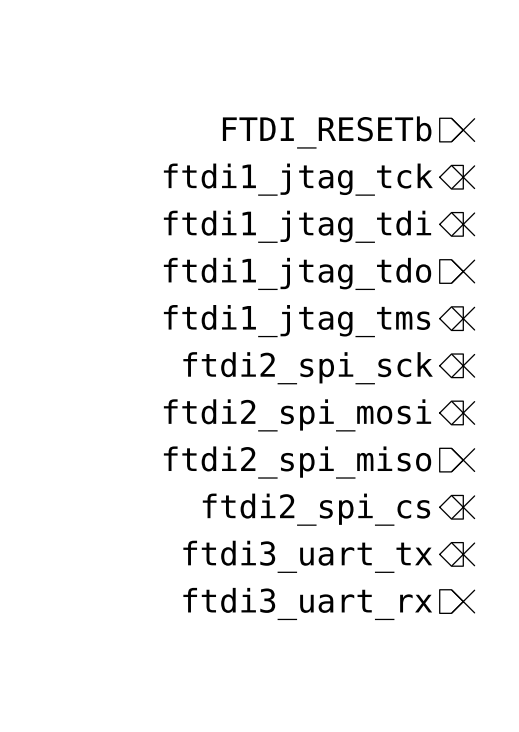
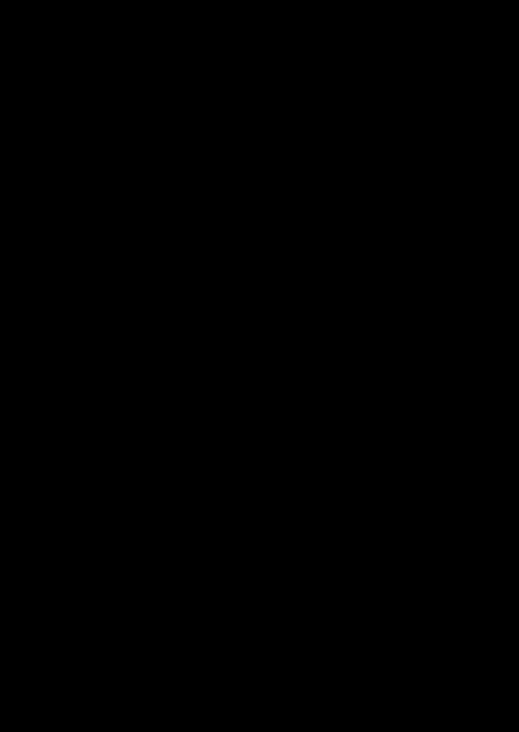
no-connect mark: (463, 130) -> none
hierarchical label: FTDI_RESETb (327, 132) -> none
no-connect mark: (463, 177) -> none
hierarchical label: ftdi1_jtag_tck (298, 179) -> none
no-connect mark: (463, 224) -> none
hierarchical label: ftdi1_jtag_tdi (297, 226) -> none
no-connect mark: (463, 271) -> none
hierarchical label: ftdi1_jtag_tdo (297, 273) -> none
no-connect mark: (463, 318) -> none
hierarchical label: ftdi1_jtag_tms (297, 321) -> none
no-connect mark: (463, 365) -> none
hierarchical label: ftdi2_spi_sck (308, 368) -> none
no-connect mark: (463, 412) -> none
hierarchical label: ftdi2_spi_mosi (297, 415) -> none
no-connect mark: (463, 460) -> none
hierarchical label: ftdi2_spi_miso (297, 462) -> none
no-connect mark: (463, 507) -> none
hierarchical label: ftdi2_spi_cs (316, 509) -> none
no-connect mark: (463, 554) -> none
hierarchical label: ftdi3_uart_tx (307, 556) -> none
no-connect mark: (463, 601) -> none
hierarchical label: ftdi3_uart_rx (307, 603) -> none

